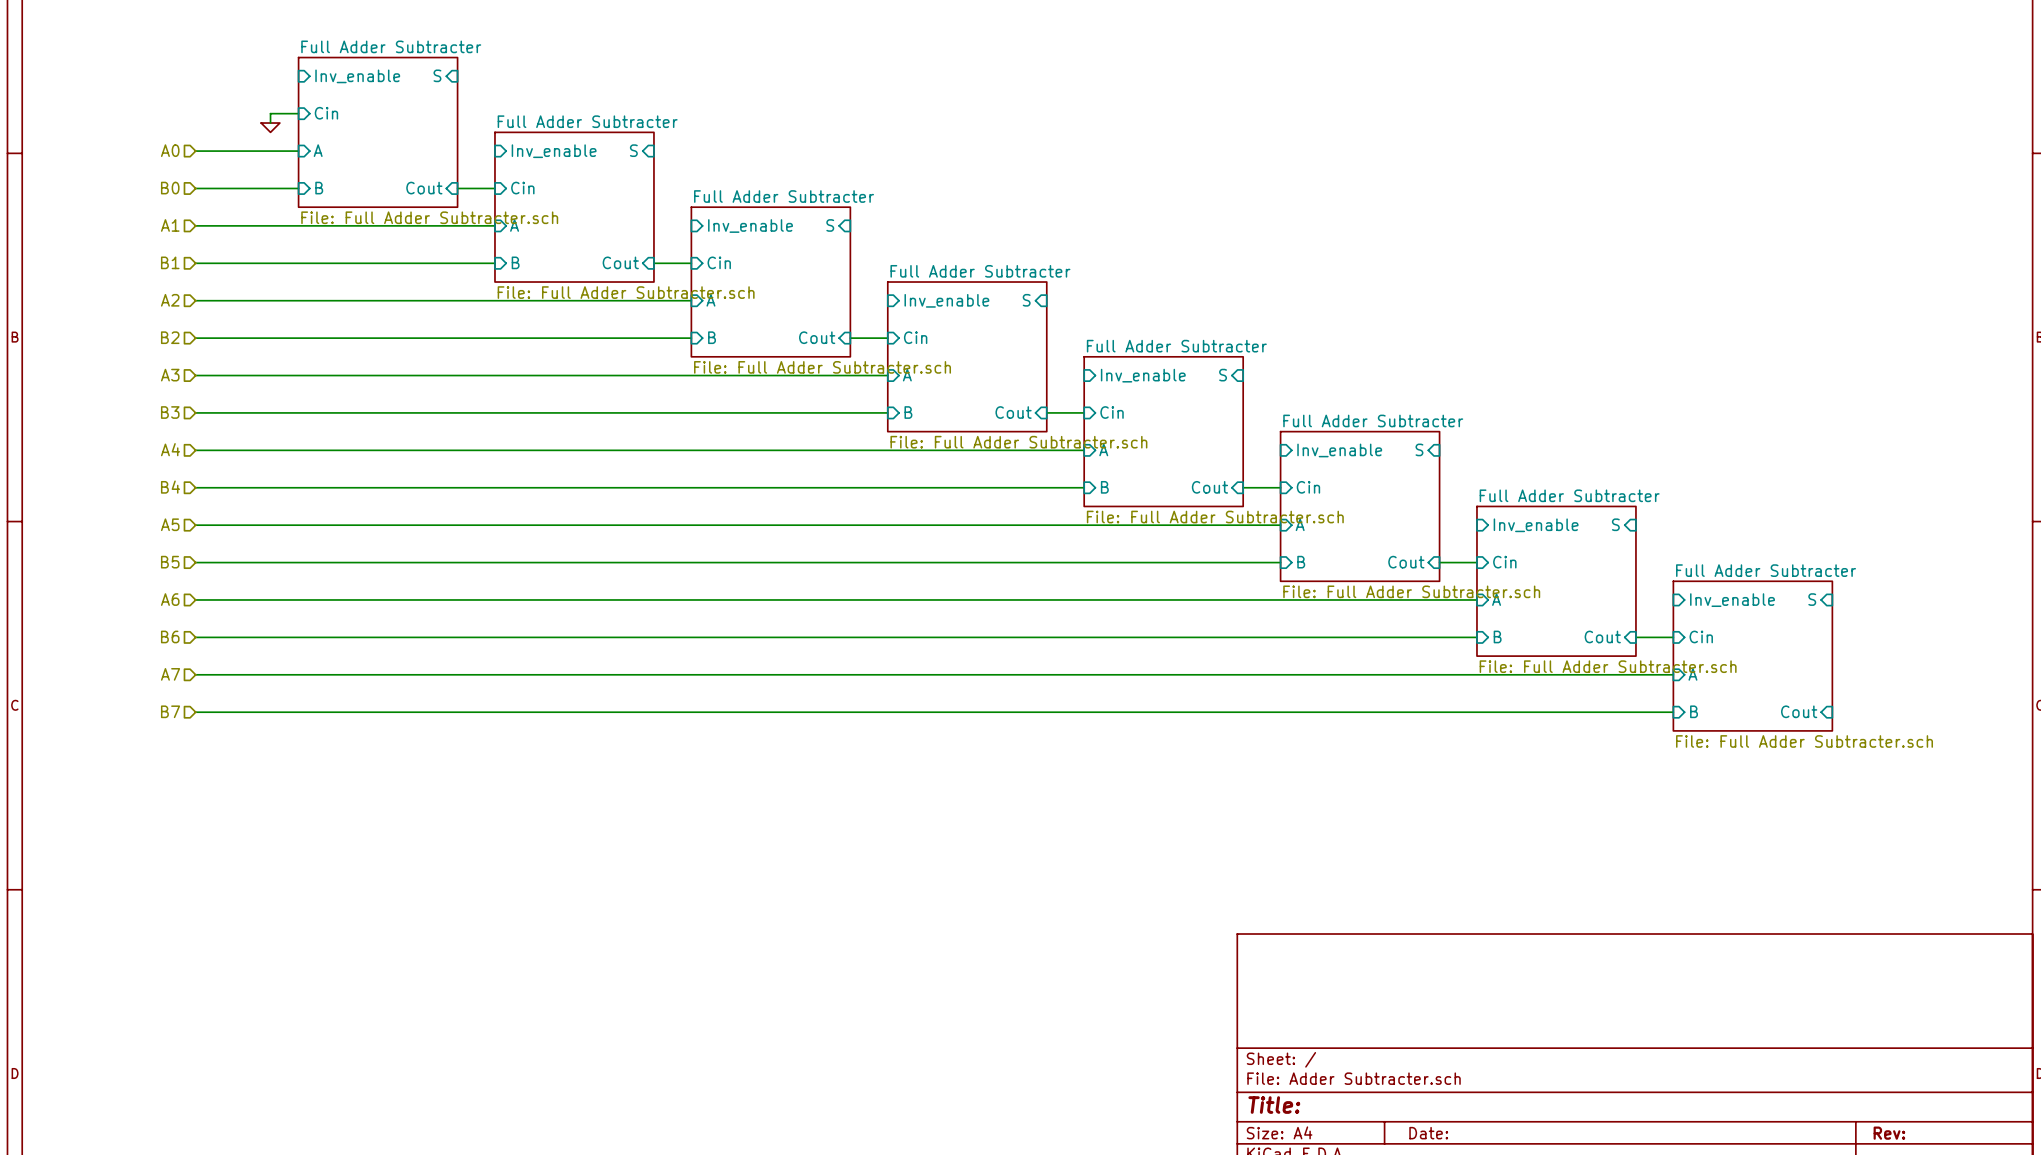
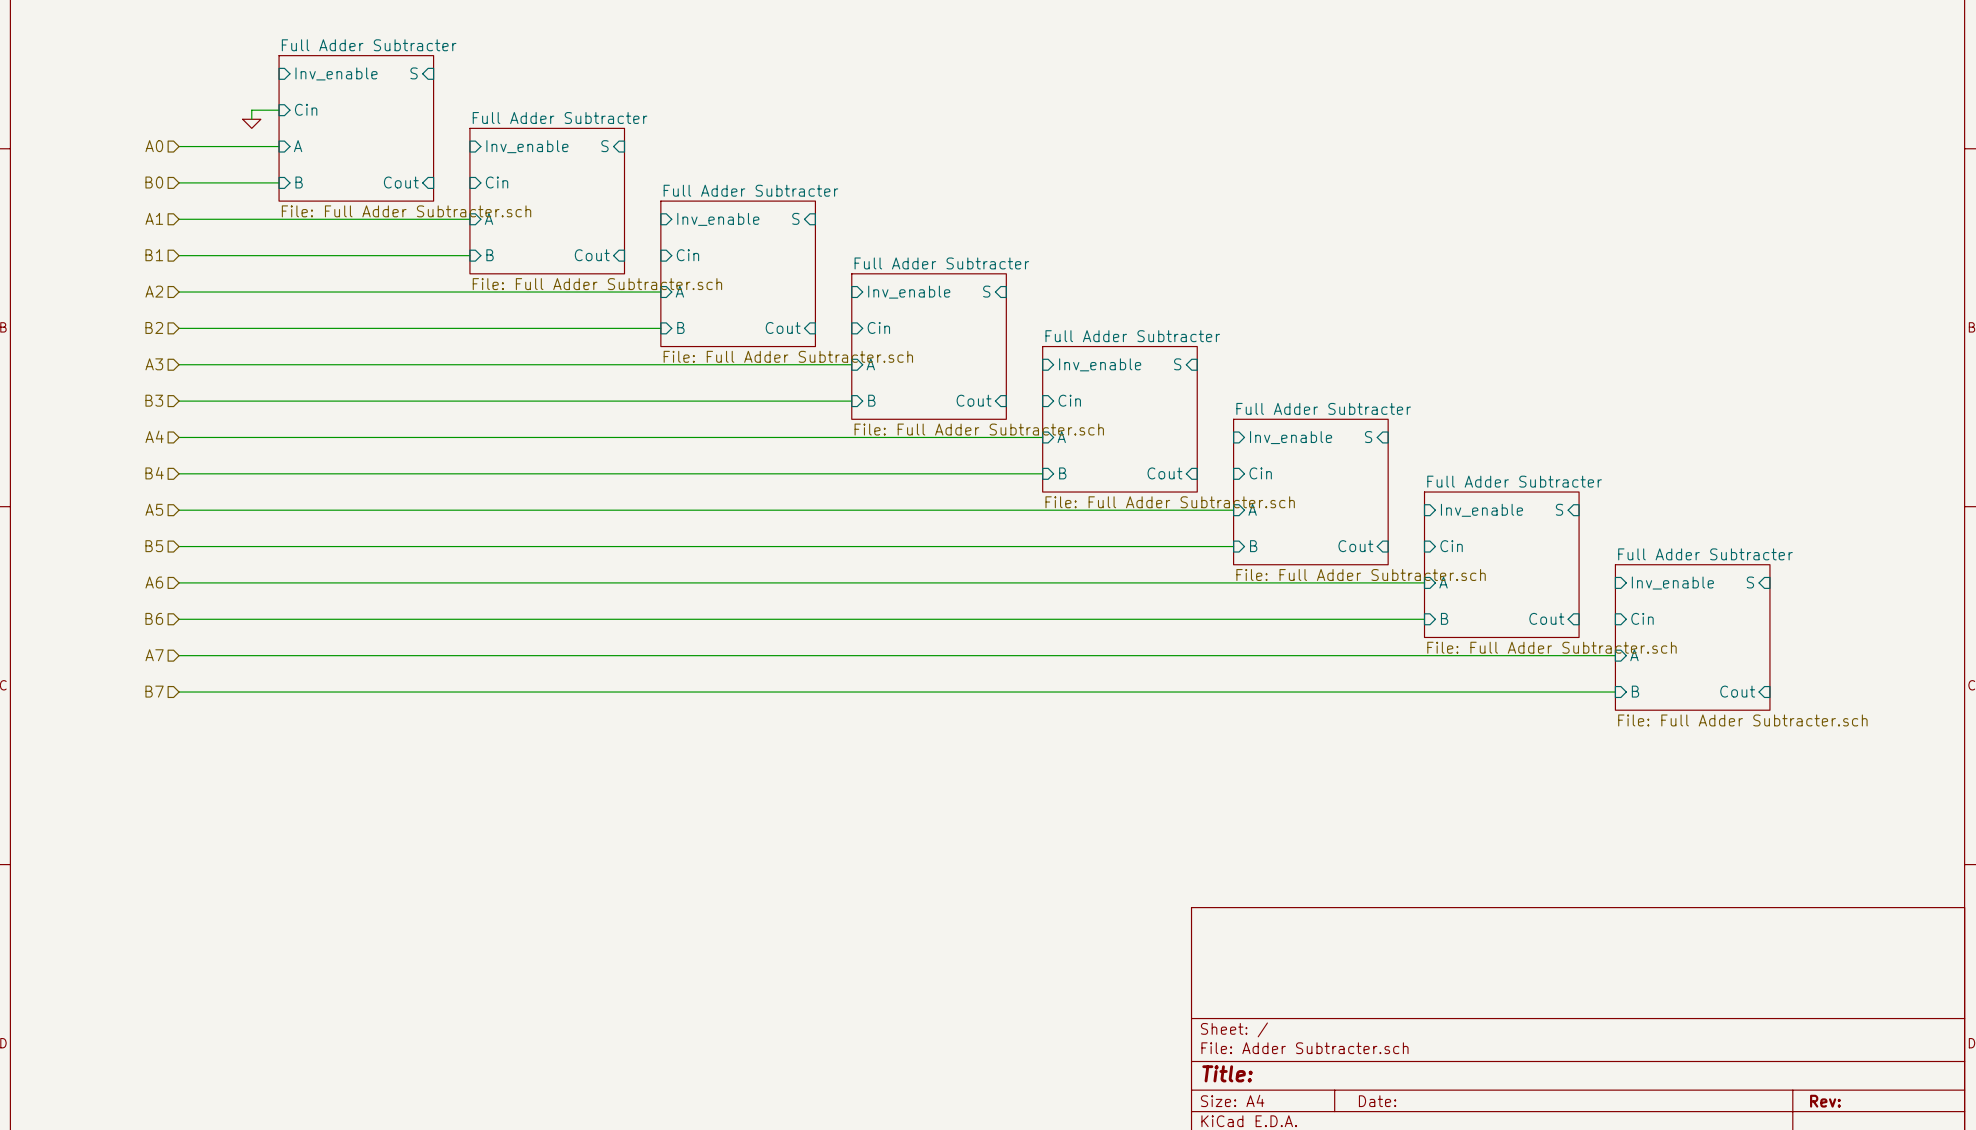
wire: (457, 188) (494, 188) -> none
wire: (653, 263) (691, 263) -> none
wire: (850, 338) (887, 338) -> none
wire: (1046, 412) (1084, 412) -> none
wire: (1243, 487) (1280, 487) -> none
wire: (1439, 562) (1476, 562) -> none
wire: (1635, 637) (1673, 637) -> none

